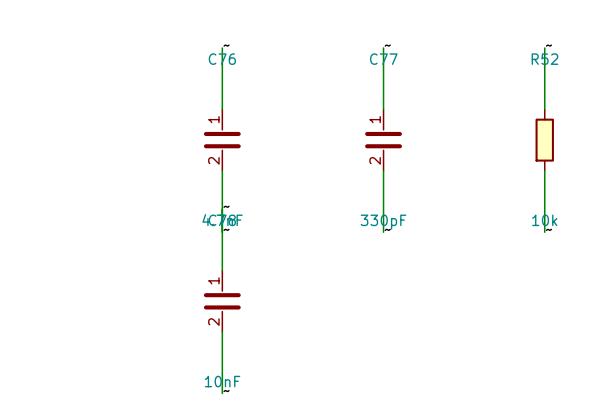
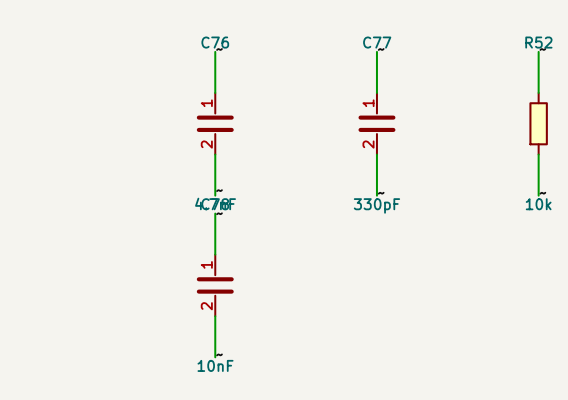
label position: ~ (226, 45) -> ~ (219, 49)
label position: ~ (387, 45) -> ~ (381, 49)
label position: ~ (548, 45) -> ~ (542, 49)
wire: (222, 47) (222, 68) -> none
wire: (383, 47) (383, 68) -> none
wire: (544, 47) (544, 68) -> none
wire: (222, 211) (222, 229) -> none
wire: (383, 211) (383, 232) -> none
wire: (544, 211) (544, 232) -> none
label position: ~ (387, 229) -> ~ (381, 193)
label position: ~ (548, 229) -> ~ (542, 193)
wire: (222, 372) (222, 393) -> none
label position: ~ (226, 391) -> ~ (219, 354)

